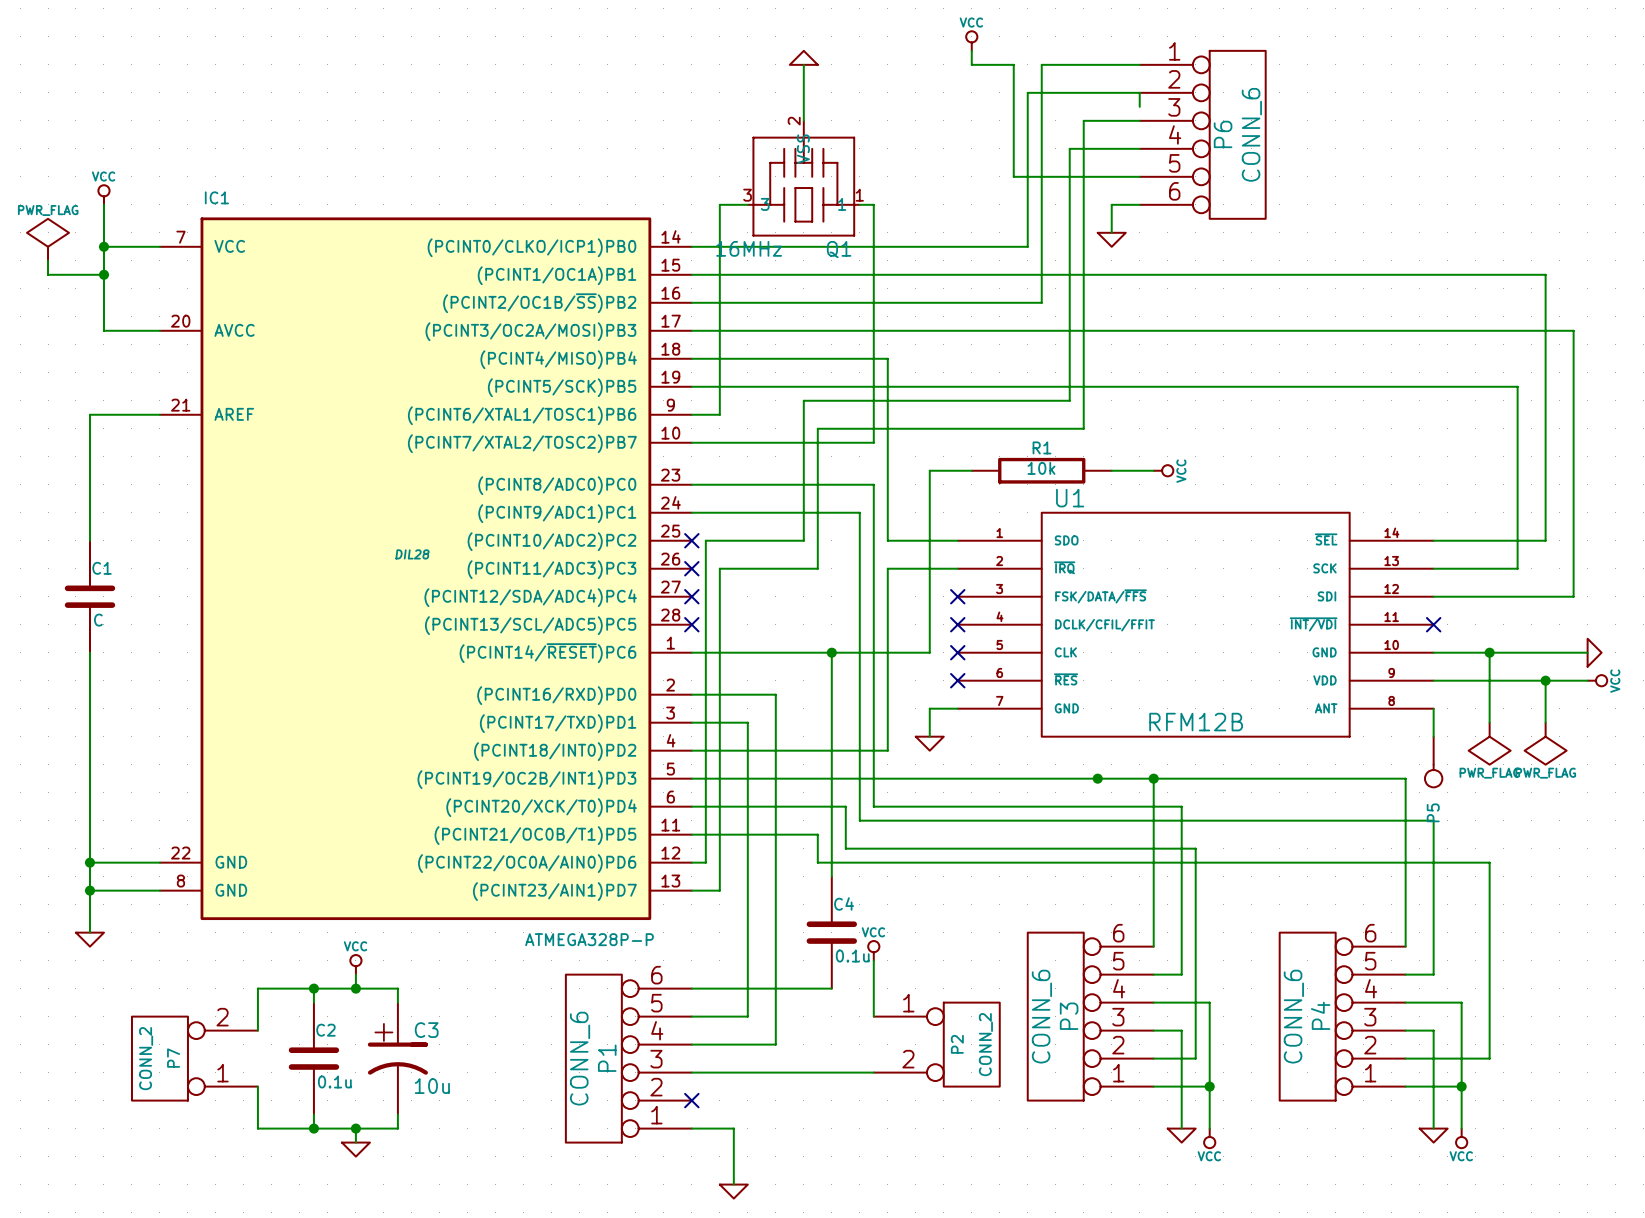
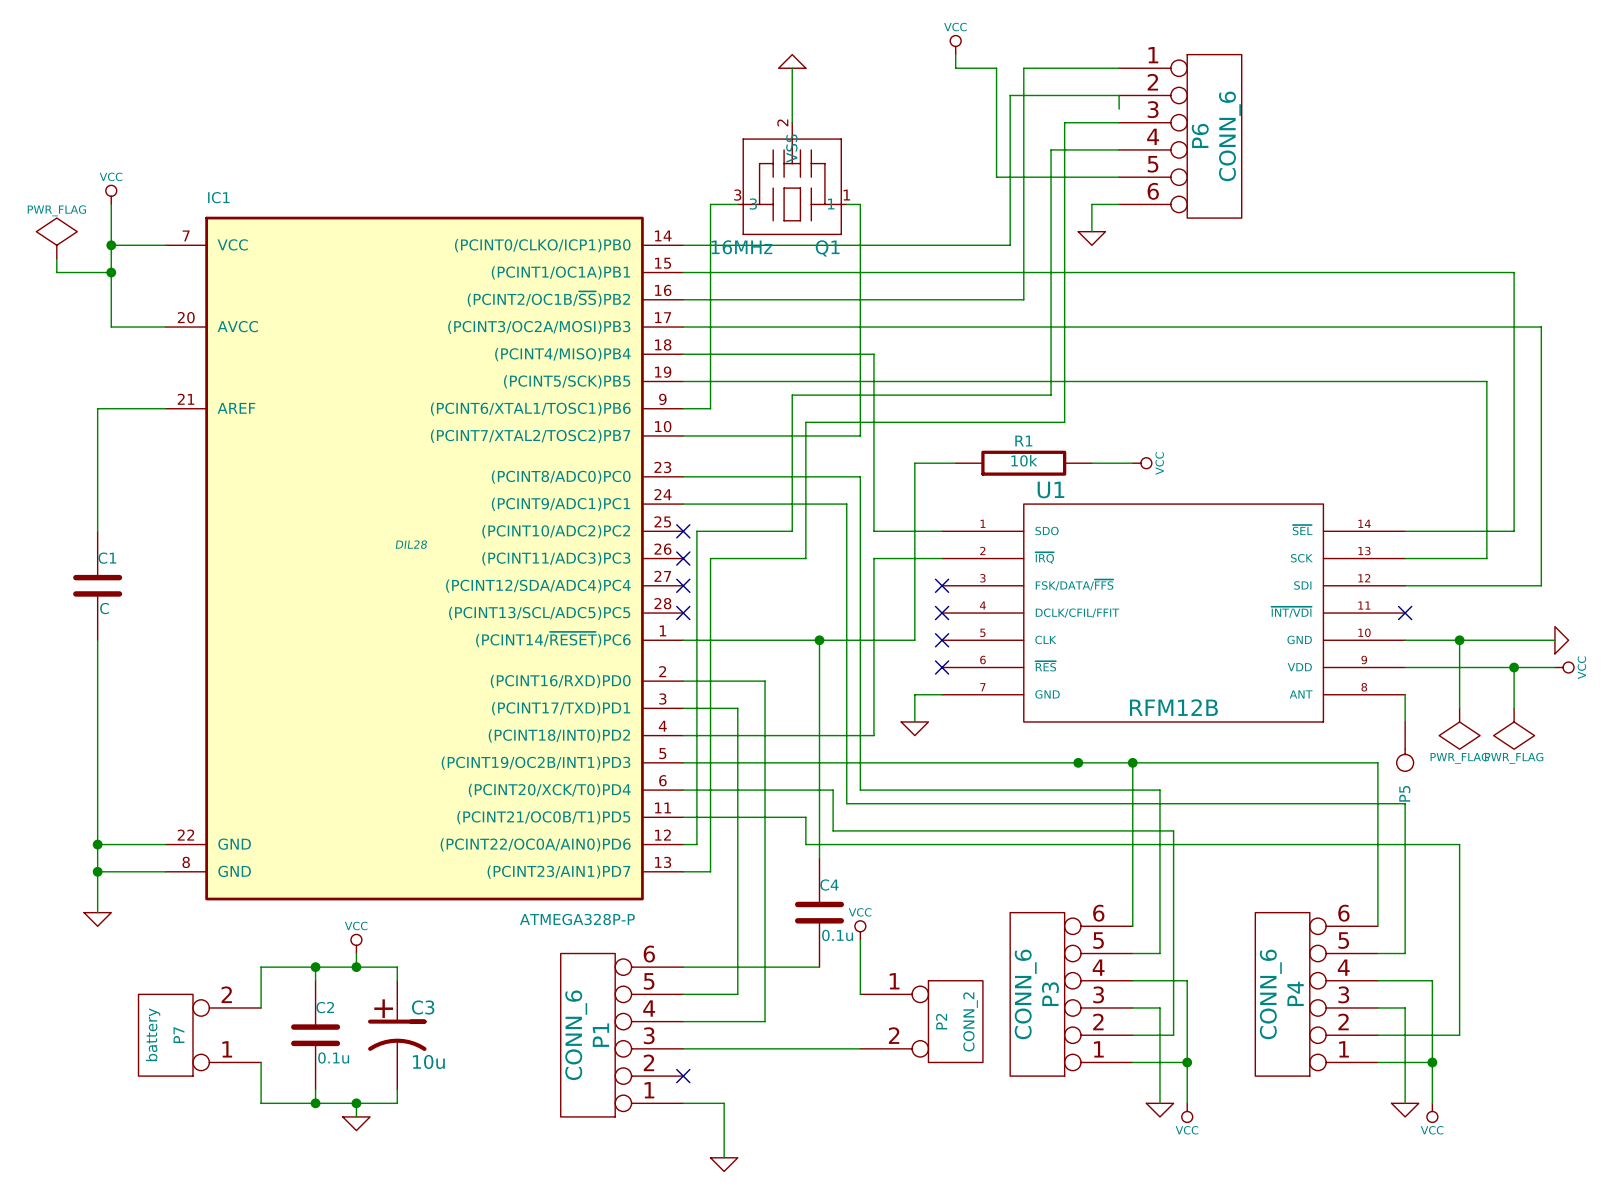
P7 value: CONN_2 (146, 1058) -> battery (153, 1034)

